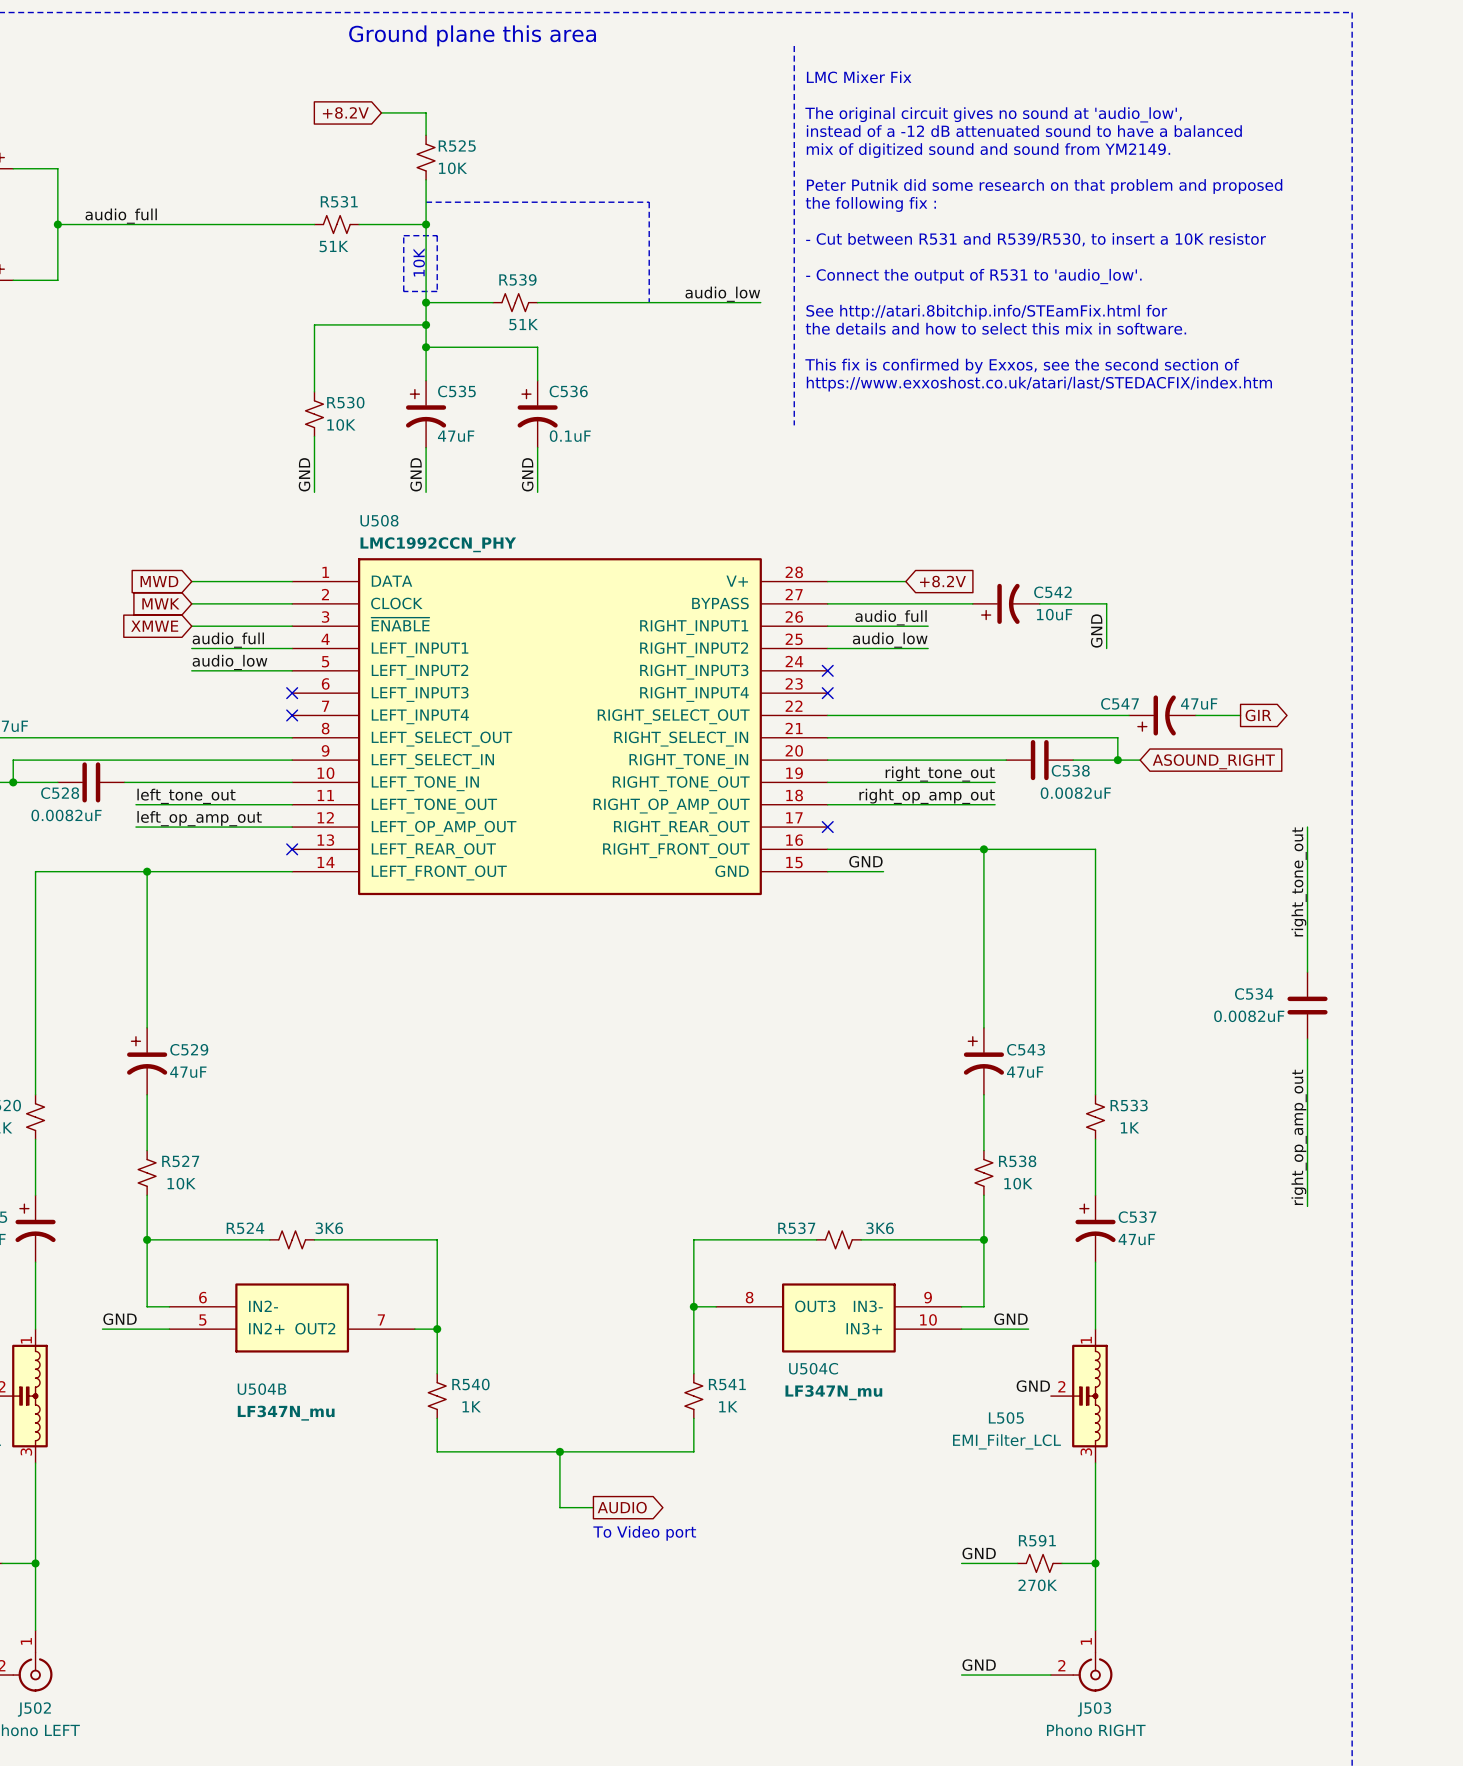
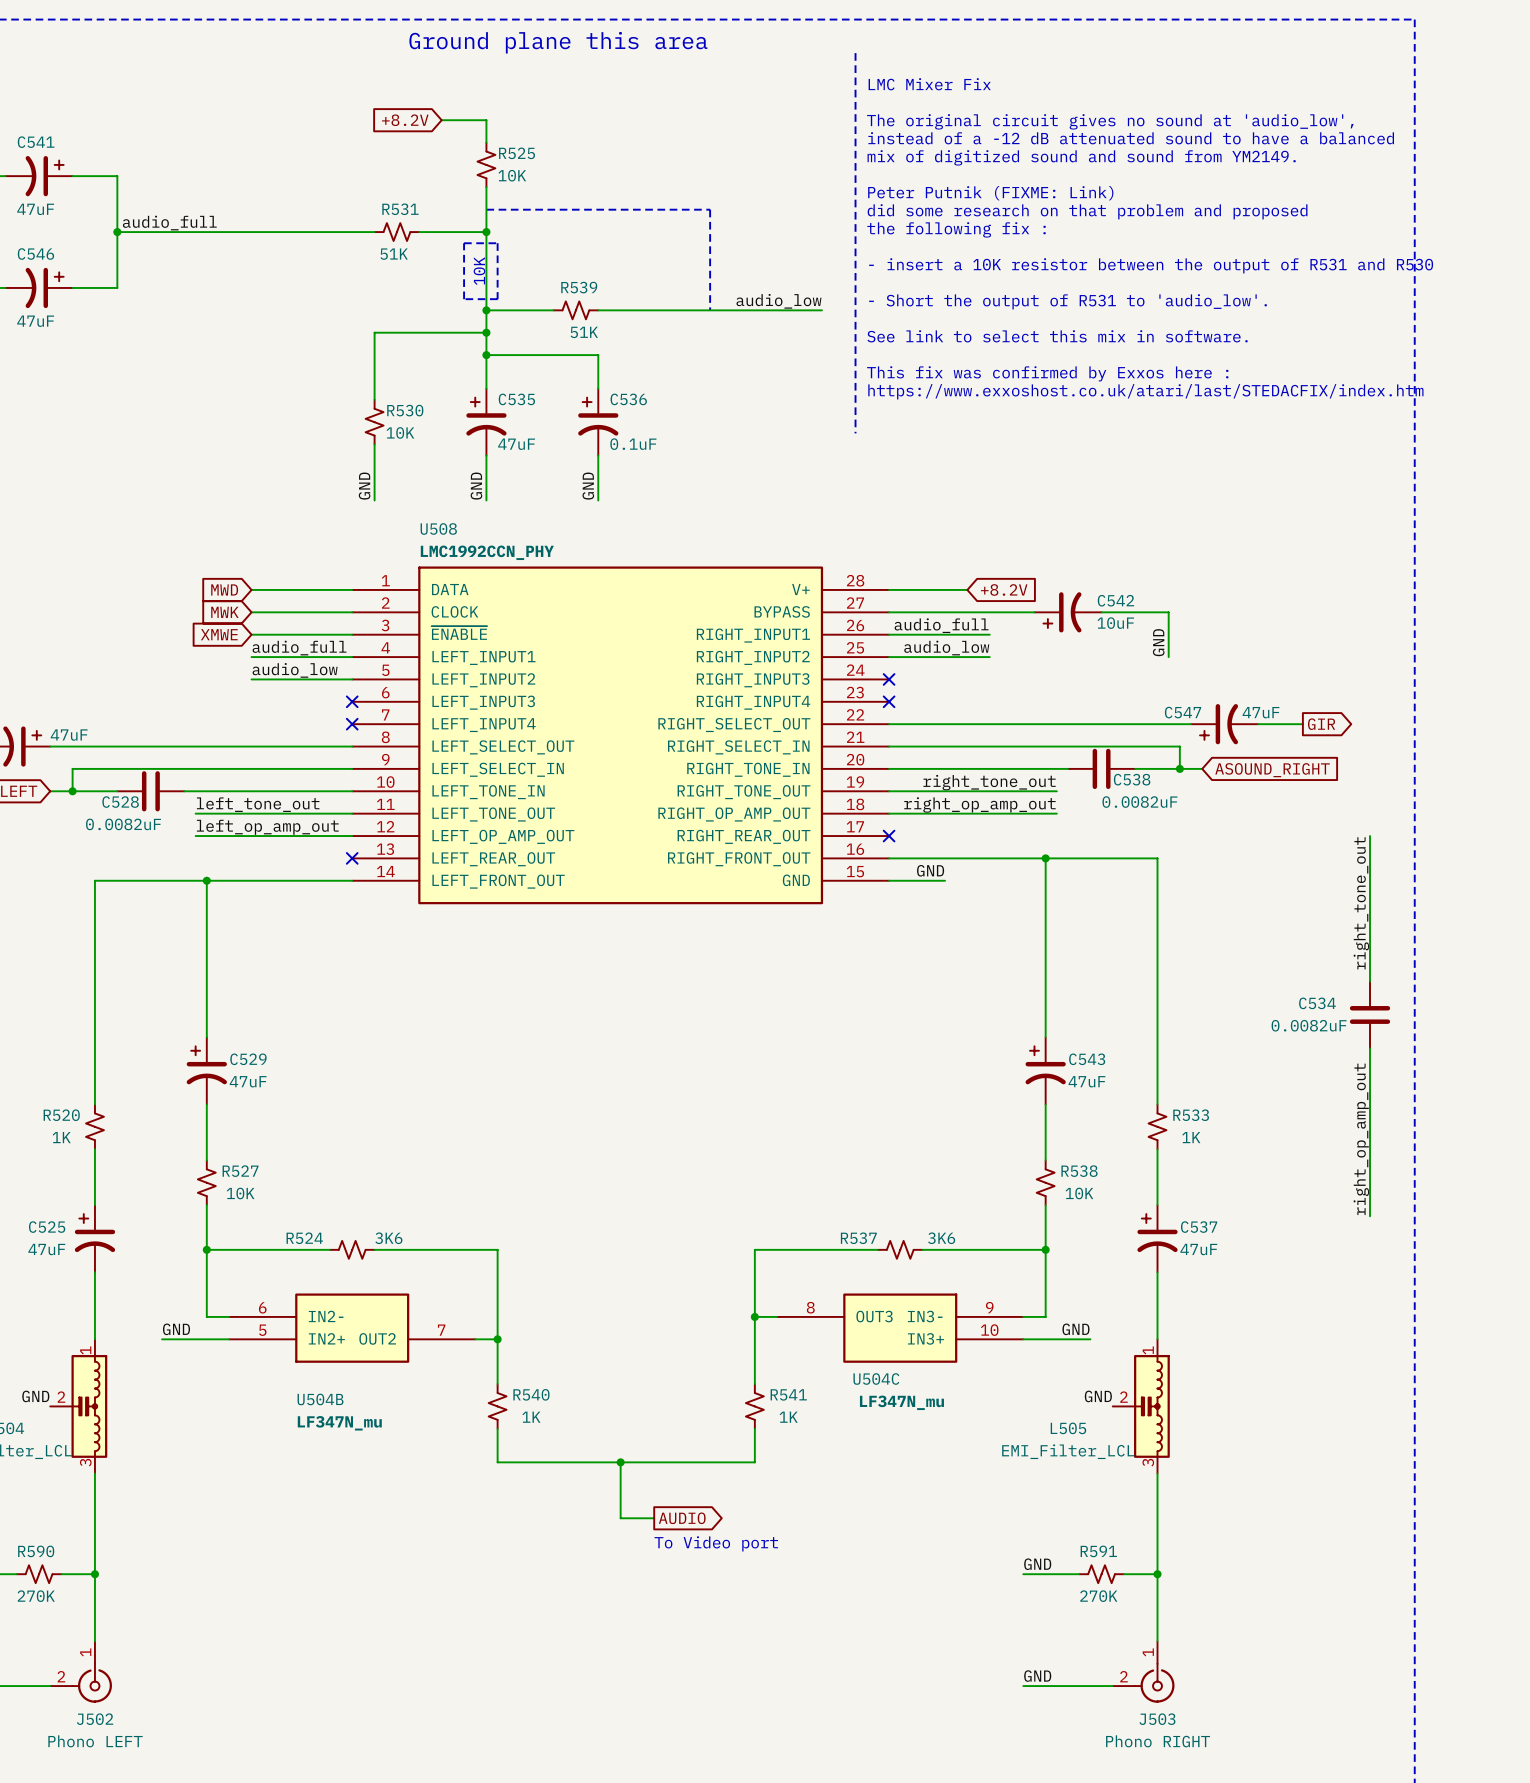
text: Peter Putnik did some research on that problem and proposed (1044, 186) -> Peter Putnik (FIXME: Link) (990, 193)
text: the following fix : (870, 204) -> did some research on that problem and proposed (1087, 211)
text: none -> the following fix : (956, 229)
text: - Cut between R531 and R539/R530, to insert a 10K resistor (1036, 239) -> none
text: none -> - insert a 10K resistor between the output of R531 and R530 (1151, 265)
text: - Connect the output of R531 to 'audio_low'. (973, 276) -> - Short the output of R531 to 'audio_low'. (1068, 301)
text: See http://atari.8bitchip.info/STEamFix.html for (986, 312) -> none
text: the details and how to select this mix in software. (995, 328) -> See link to select this mix in software. (1057, 336)
text: This fix is confirmed by Exxos, see the second section of (1022, 366) -> This fix was confirmed by Exxos here : (1047, 373)

